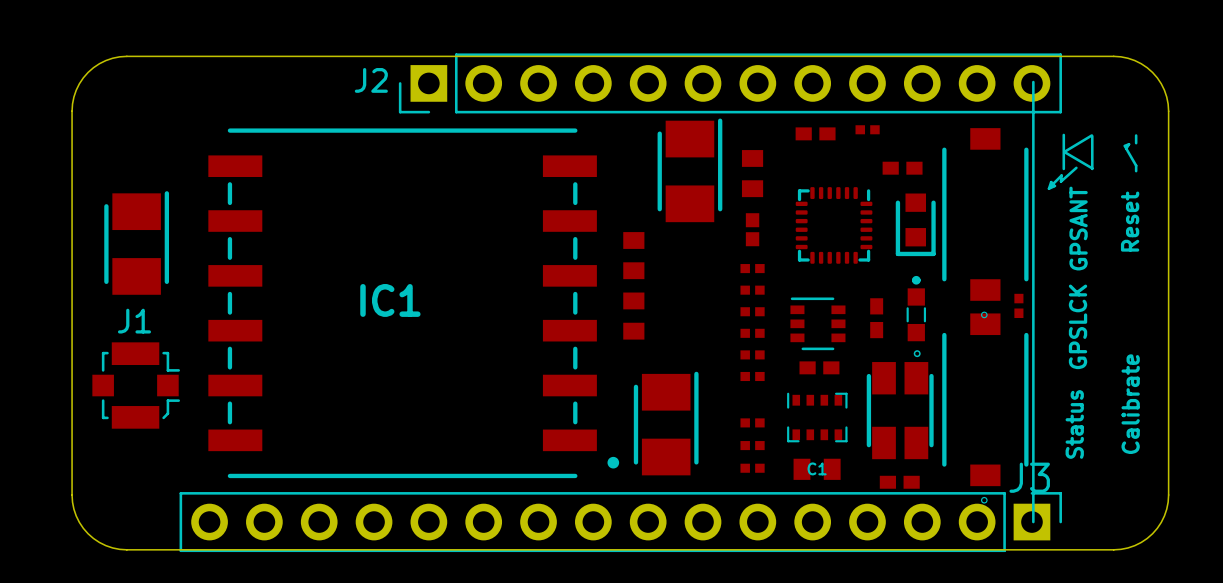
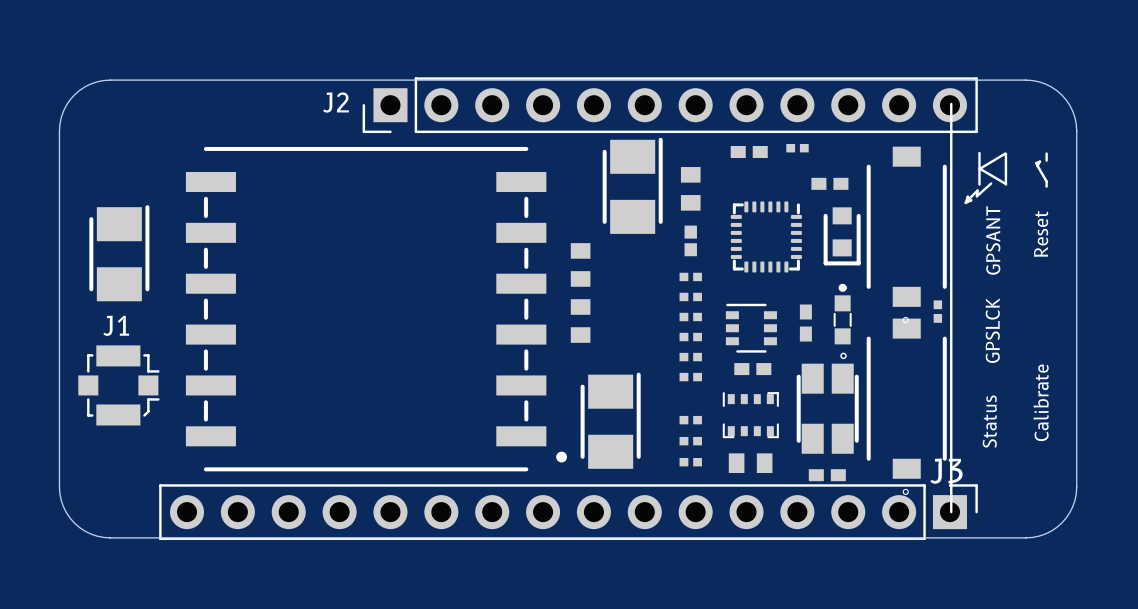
IC1 name: IC1 (390, 300) -> none
C1 name: C1 (817, 468) -> none

